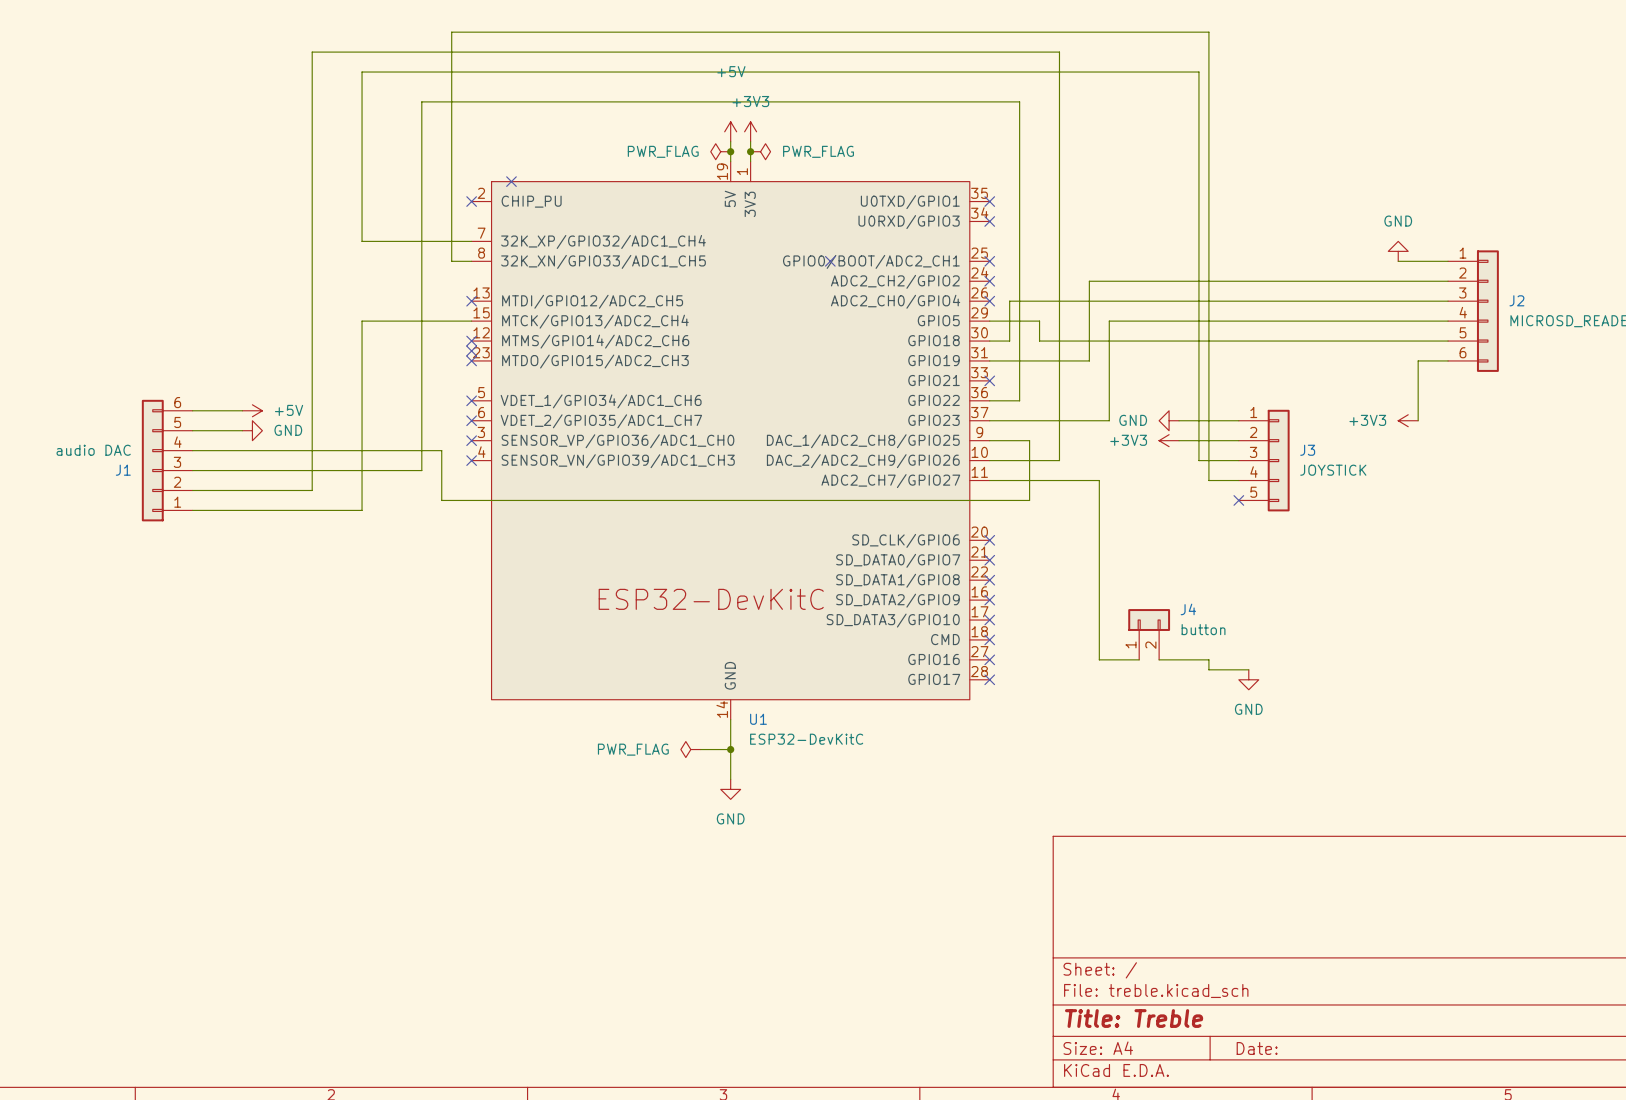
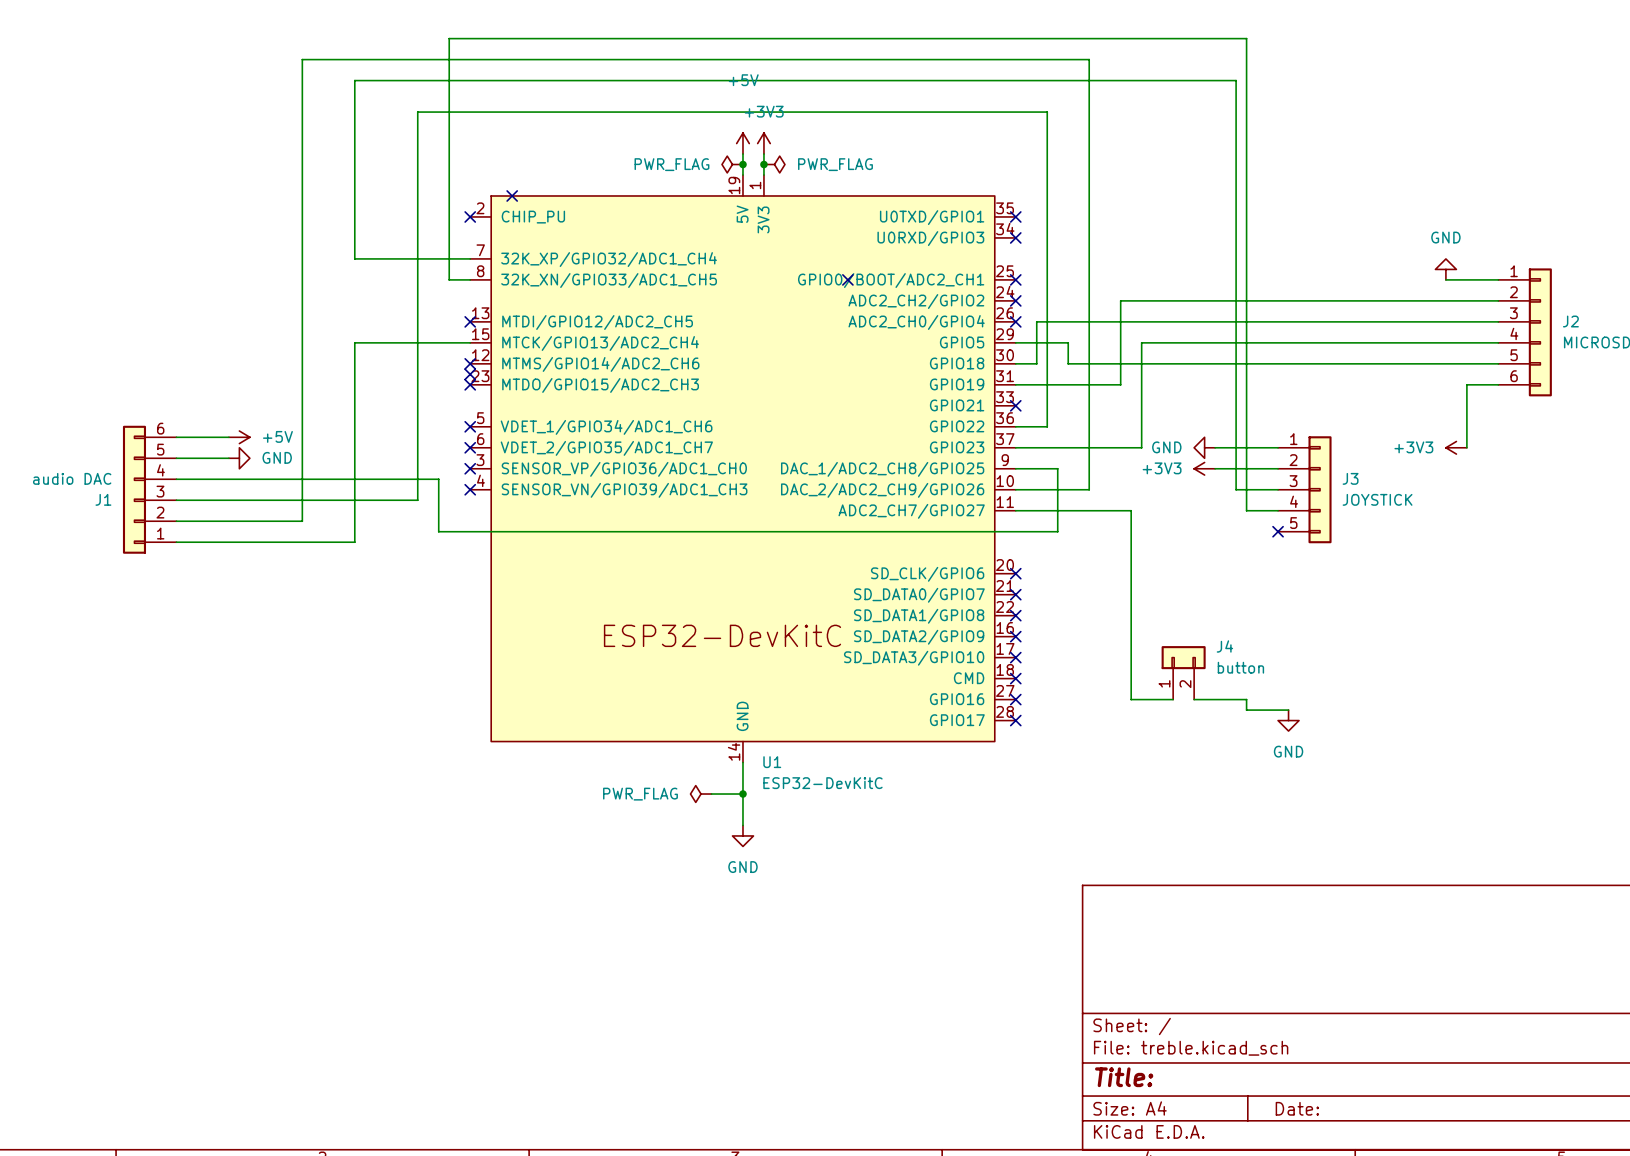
title block: Title: Treble (1134, 1018) -> Title: (1124, 1077)

